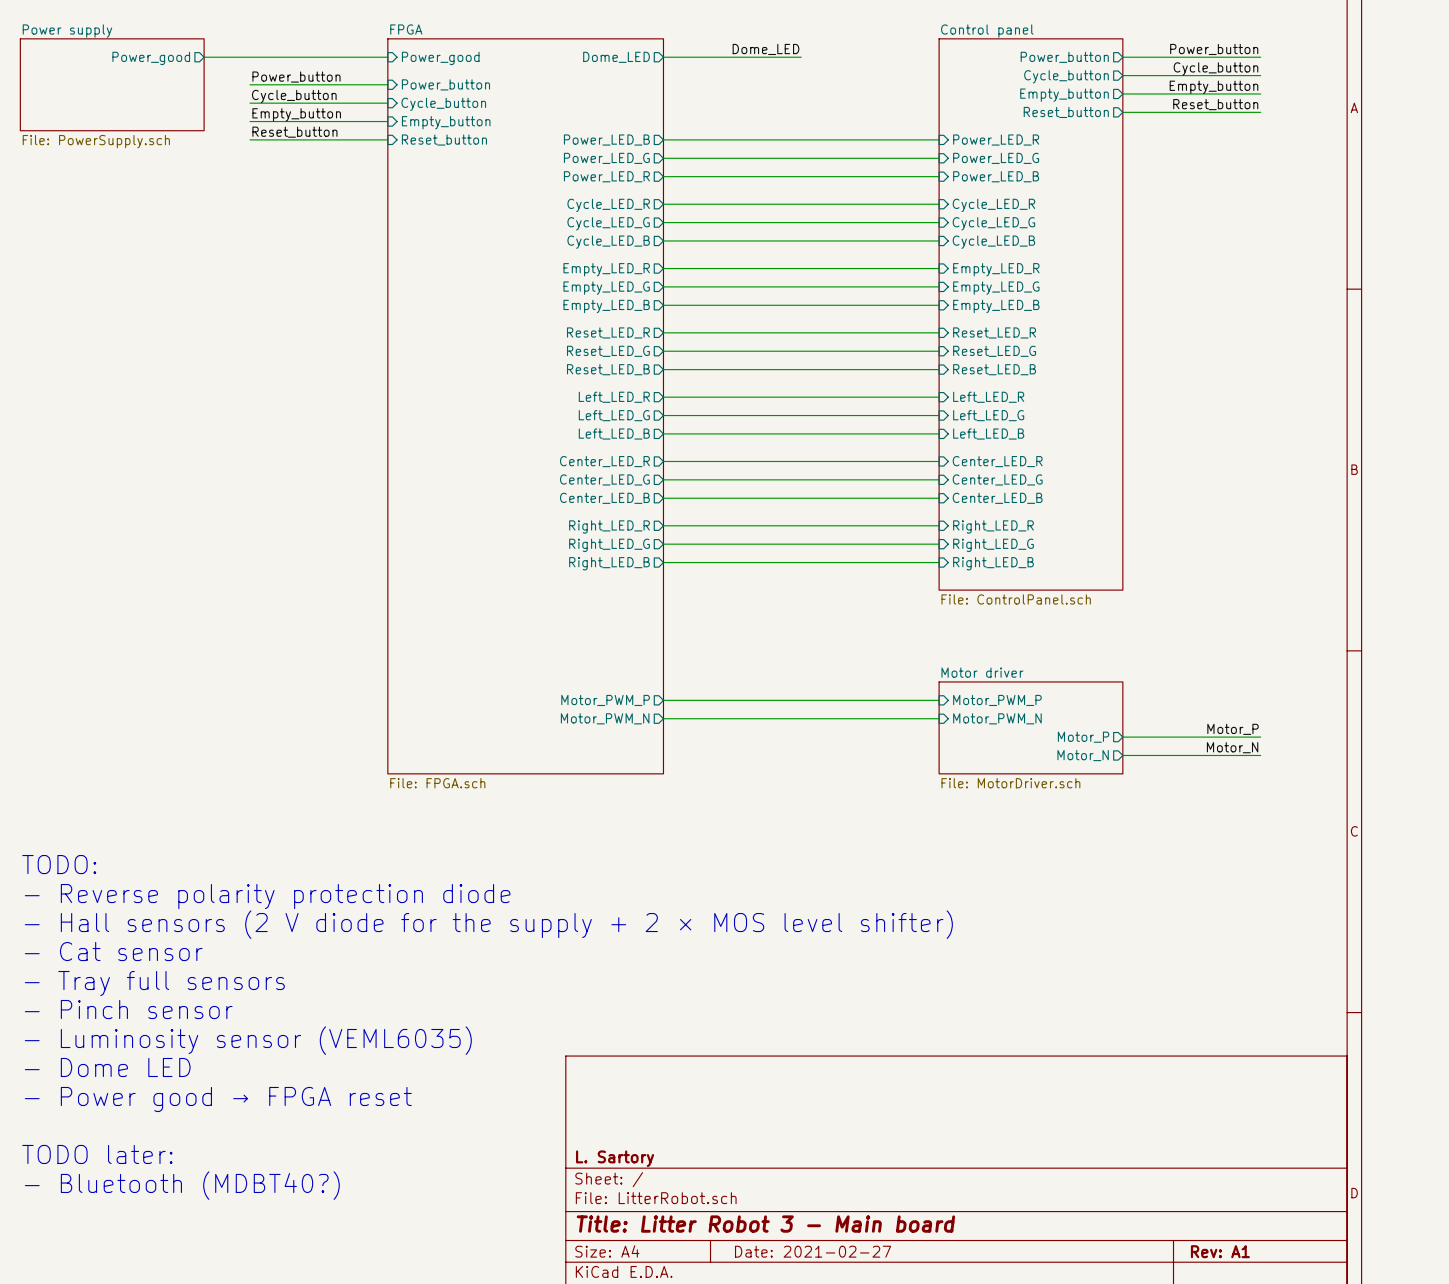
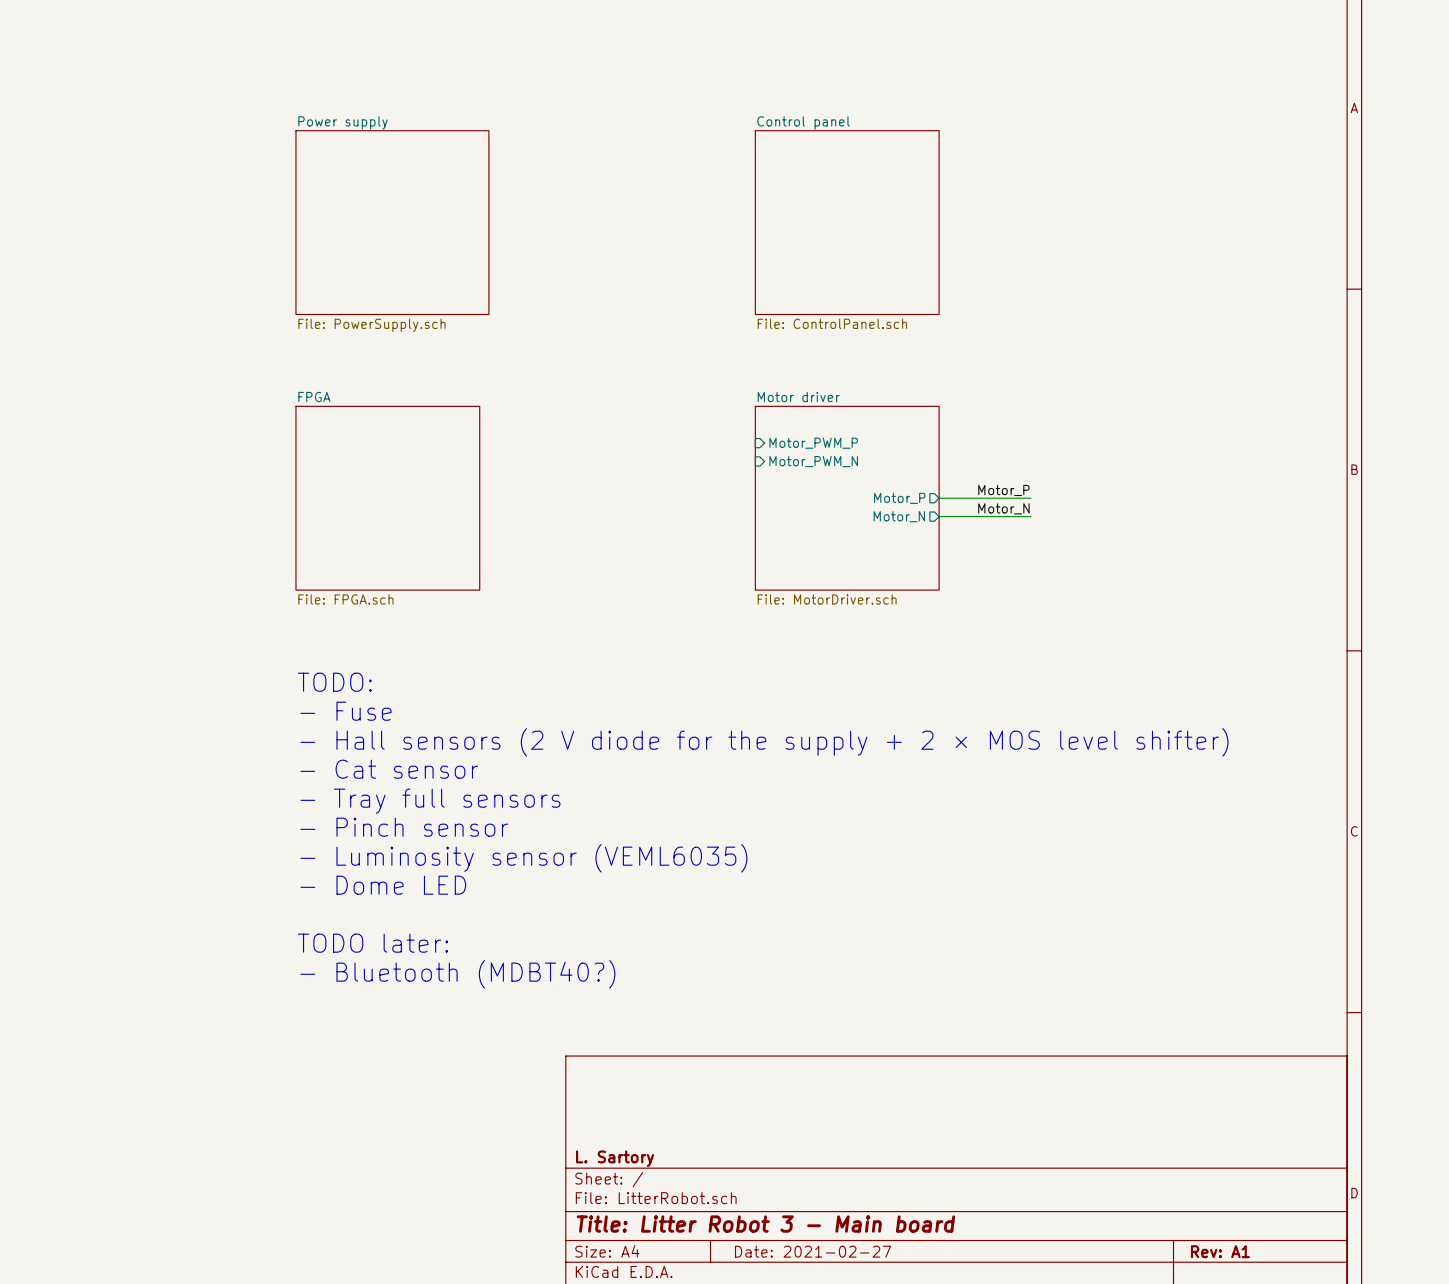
label: Dome_LED (766, 49) -> none
label: Power_button (1214, 49) -> none
wire: (204, 57) (387, 57) -> none
sheet pin: Dome_LED (616, 57) -> none
wire: (663, 57) (801, 57) -> none
sheet pin: Power_button (1064, 57) -> none
wire: (1122, 57) (1260, 57) -> none
sheet pin: Power_good (151, 58) -> none
sheet pin: Power_good (440, 58) -> none
label: Cycle_button (1215, 68) -> none
wire: (1122, 75) (1260, 75) -> none
sheet pin: Cycle_button (1066, 76) -> none
label: Power_button (296, 77) -> none
sheet Power supply: File: PowerSupply.sch (112, 84) -> none
wire: (250, 84) (387, 84) -> none
sheet pin: Power_button (445, 84) -> none
label: Empty_button (1214, 87) -> none
wire: (1122, 93) (1260, 93) -> none
sheet pin: Empty_button (1064, 95) -> none
label: Cycle_button (294, 96) -> none
wire: (250, 103) (387, 103) -> none
sheet pin: Cycle_button (443, 104) -> none
label: Reset_button (1215, 104) -> none
sheet pin: Reset_button (1066, 112) -> none
wire: (1122, 112) (1260, 112) -> none
label: Empty_button (296, 114) -> none
wire: (250, 121) (387, 121) -> none
sheet pin: Empty_button (446, 122) -> none
label: Reset_button (294, 132) -> none
wire: (250, 139) (387, 139) -> none
wire: (663, 139) (939, 139) -> none
sheet pin: Reset_button (444, 140) -> none
sheet pin: Power_LED_B (606, 140) -> none
sheet pin: Power_LED_R (996, 140) -> none
sheet pin: Power_LED_G (606, 158) -> none
wire: (663, 158) (939, 158) -> none
sheet pin: Power_LED_G (996, 158) -> none
sheet pin: Power_LED_R (606, 176) -> none
wire: (663, 176) (939, 176) -> none
sheet pin: Power_LED_B (996, 176) -> none
wire: (663, 204) (939, 204) -> none
sheet pin: Cycle_LED_R (608, 205) -> none
sheet pin: Cycle_LED_R (993, 205) -> none
sheet Power supply: none -> File: PowerSupply.sch (392, 222)
wire: (663, 222) (939, 222) -> none
sheet Control panel: none -> File: ControlPanel.sch (847, 222)
sheet pin: Cycle_LED_G (608, 223) -> none
sheet pin: Cycle_LED_G (993, 223) -> none
wire: (663, 240) (939, 240) -> none
sheet pin: Cycle_LED_B (608, 242) -> none
sheet pin: Cycle_LED_B (993, 242) -> none
wire: (663, 268) (939, 268) -> none
sheet pin: Empty_LED_R (606, 269) -> none
sheet pin: Empty_LED_R (996, 269) -> none
wire: (663, 286) (939, 286) -> none
sheet pin: Empty_LED_G (606, 288) -> none
sheet pin: Empty_LED_G (996, 288) -> none
wire: (663, 305) (939, 305) -> none
sheet pin: Empty_LED_B (606, 306) -> none
sheet pin: Empty_LED_B (996, 306) -> none
sheet Control panel: File: ControlPanel.sch (1030, 314) -> none
sheet pin: Reset_LED_R (608, 332) -> none
wire: (663, 332) (939, 332) -> none
sheet pin: Reset_LED_R (994, 332) -> none
sheet pin: Reset_LED_G (608, 351) -> none
wire: (663, 351) (939, 351) -> none
sheet pin: Reset_LED_G (994, 351) -> none
sheet pin: Reset_LED_B (608, 369) -> none
wire: (663, 369) (939, 369) -> none
sheet pin: Reset_LED_B (994, 369) -> none
sheet pin: Left_LED_R (614, 397) -> none
wire: (663, 397) (939, 397) -> none
sheet pin: Left_LED_R (988, 397) -> none
sheet FPGA: File: FPGA.sch (525, 406) -> none
sheet pin: Left_LED_G (614, 415) -> none
wire: (663, 415) (939, 415) -> none
sheet pin: Left_LED_G (988, 415) -> none
wire: (663, 433) (939, 433) -> none
sheet pin: Left_LED_B (614, 434) -> none
sheet pin: Left_LED_B (988, 434) -> none
sheet pin: none -> Motor_PWM_P (813, 443)
sheet pin: Center_LED_R (604, 461) -> none
wire: (663, 461) (939, 461) -> none
sheet pin: none -> Motor_PWM_N (813, 461)
sheet pin: Center_LED_R (997, 461) -> none
sheet pin: Center_LED_G (604, 479) -> none
wire: (663, 479) (939, 479) -> none
sheet pin: Center_LED_G (997, 479) -> none
label: none -> Motor_P (1003, 490)
sheet FPGA: none -> File: FPGA.sch (387, 498)
sheet pin: Center_LED_B (604, 498) -> none
wire: (663, 498) (939, 498) -> (1030, 498) (939, 498)
sheet Motor driver: none -> File: MotorDriver.sch (847, 498)
sheet pin: none -> Motor_P (899, 498)
sheet pin: Center_LED_B (997, 498) -> none
label: none -> Motor_N (1003, 508)
sheet pin: none -> Motor_N (899, 516)
wire: none -> (939, 516) (1030, 516)
wire: (663, 525) (939, 525) -> none
sheet pin: Right_LED_R (609, 526) -> none
sheet pin: Right_LED_R (993, 526) -> none
wire: (663, 544) (939, 544) -> none
sheet pin: Right_LED_G (609, 545) -> none
sheet pin: Right_LED_G (993, 545) -> none
wire: (663, 562) (939, 562) -> none
sheet pin: Right_LED_B (609, 563) -> none
sheet pin: Right_LED_B (993, 563) -> none
text: none -> TODO: (334, 682)
sheet pin: Motor_PWM_P (605, 700) -> none
wire: (663, 700) (939, 700) -> none
sheet pin: Motor_PWM_P (997, 700) -> none
text: none -> - Fuse (346, 711)
sheet pin: Motor_PWM_N (605, 718) -> none
wire: (663, 718) (939, 718) -> none
sheet pin: Motor_PWM_N (997, 718) -> none
sheet Motor driver: File: MotorDriver.sch (1030, 727) -> none
label: Motor_P (1233, 729) -> none
sheet pin: Motor_P (1083, 737) -> none
wire: (1122, 737) (1260, 737) -> none
text: none -> - Hall sensors (2 V diode for the supply + 2 × MOS level shifter) (764, 742)
label: Motor_N (1232, 747) -> none
sheet pin: Motor_N (1083, 755) -> none
wire: (1122, 755) (1260, 755) -> none
text: none -> - Cat sensor (389, 769)
text: none -> - Tray full sensors (430, 801)
text: none -> - Pinch sensor (404, 827)
text: none -> - Luminosity sensor (VEML6035) (523, 858)
text: TODO: (59, 864) -> none
text: none -> - Dome LED (383, 885)
text: - Reverse polarity protection diode (267, 896) -> none
text: - Hall sensors (2 V diode for the supply + 2 × MOS level shifter) (488, 924) -> none
text: none -> TODO later: (373, 943)
text: - Cat sensor (113, 951) -> none
text: none -> - Bluetooth (MDBT40?) (457, 974)
text: - Tray full sensors (154, 983) -> none
text: - Pinch sensor (128, 1009) -> none
text: - Luminosity sensor (VEML6035) (248, 1040) -> none
text: - Dome LED (107, 1067) -> none
text: - Power good → FPGA reset (218, 1099) -> none
text: TODO later: (97, 1154) -> none
text: - Bluetooth (MDBT40?) (182, 1185) -> none

